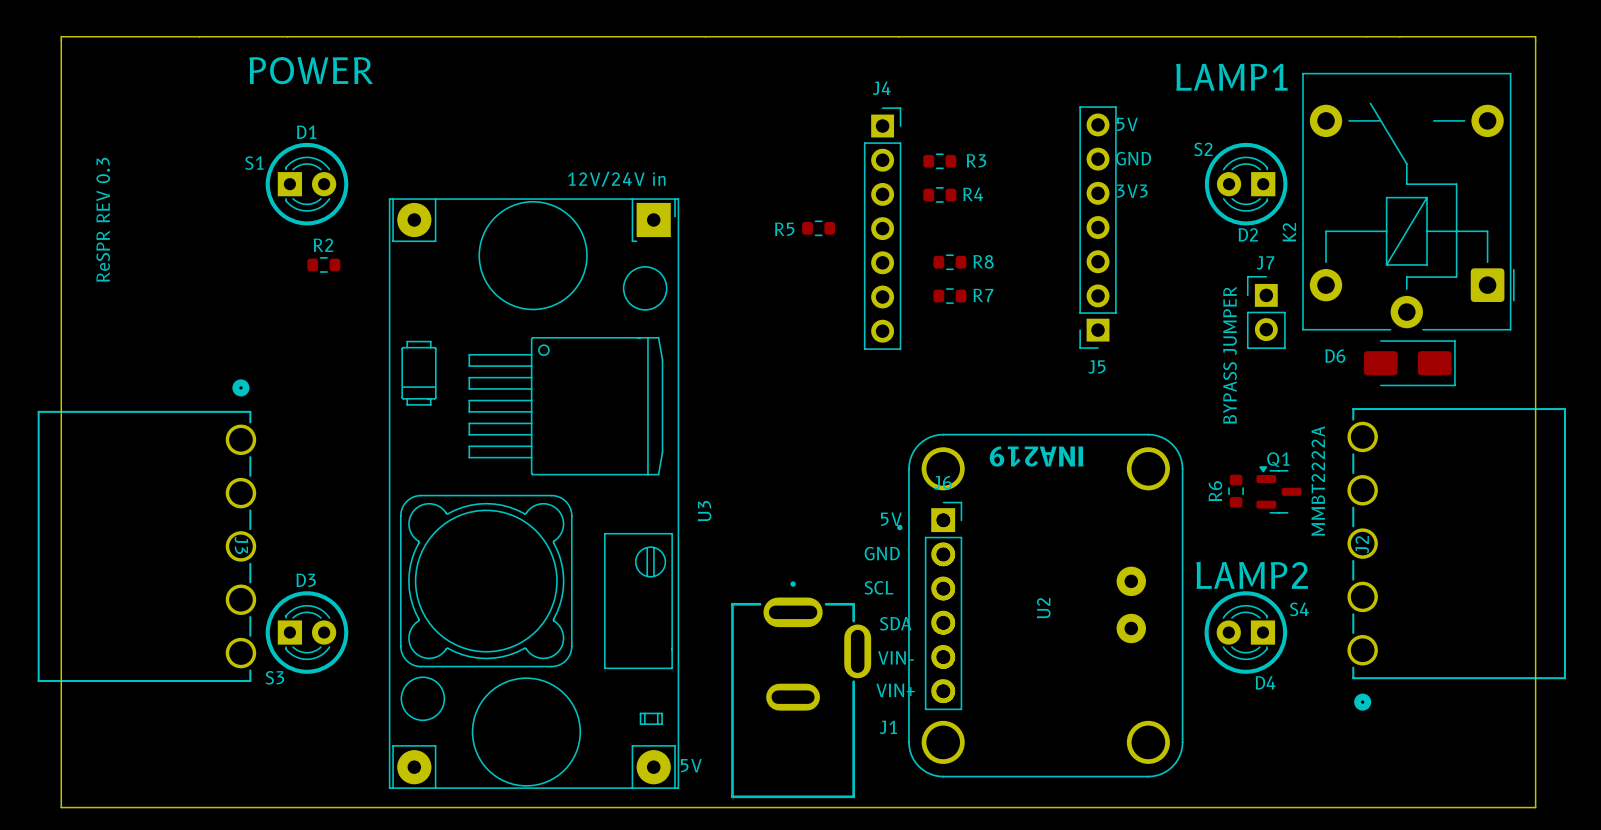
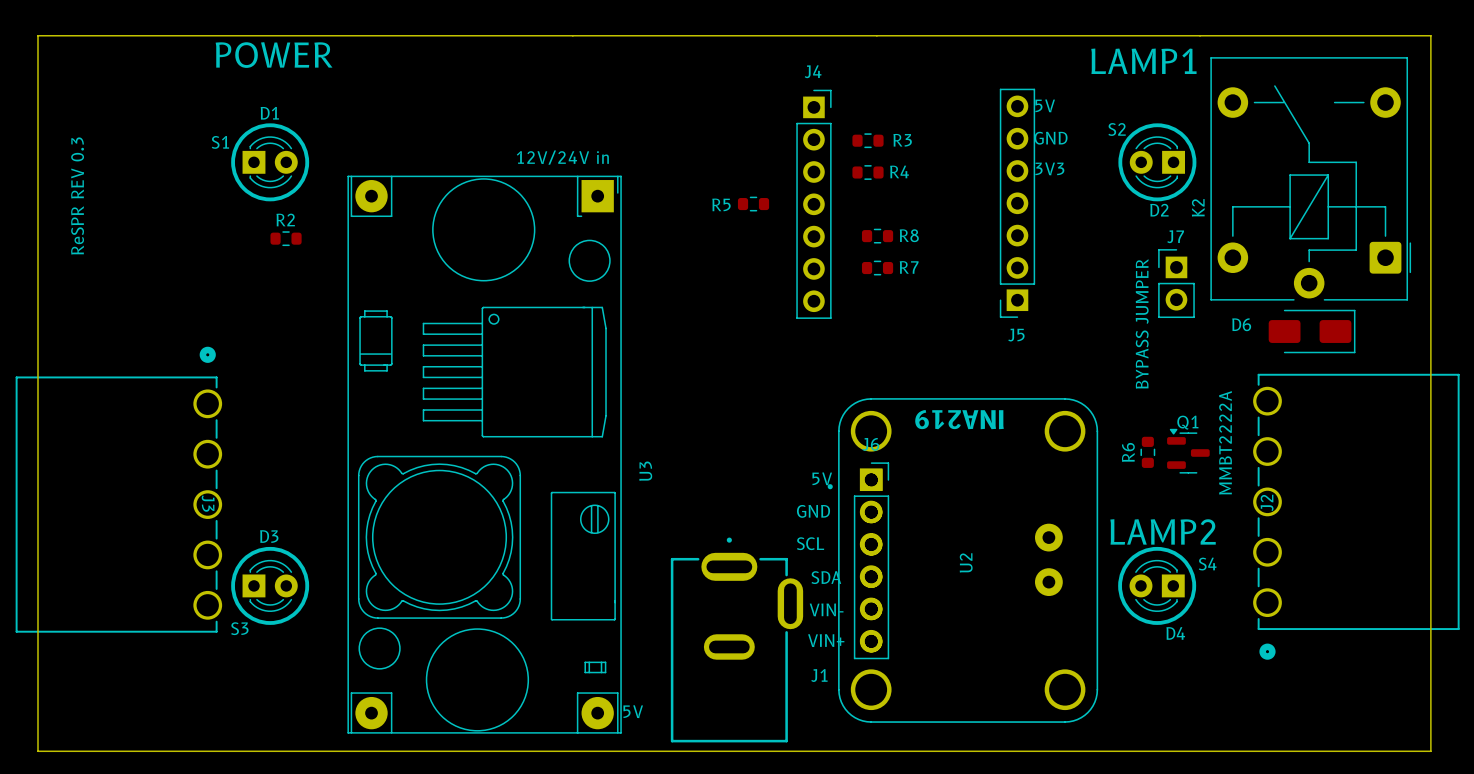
board edge: (61, 50) (61, 36) (1535, 36) (1535, 50) -> (37, 35) (1430, 35)

